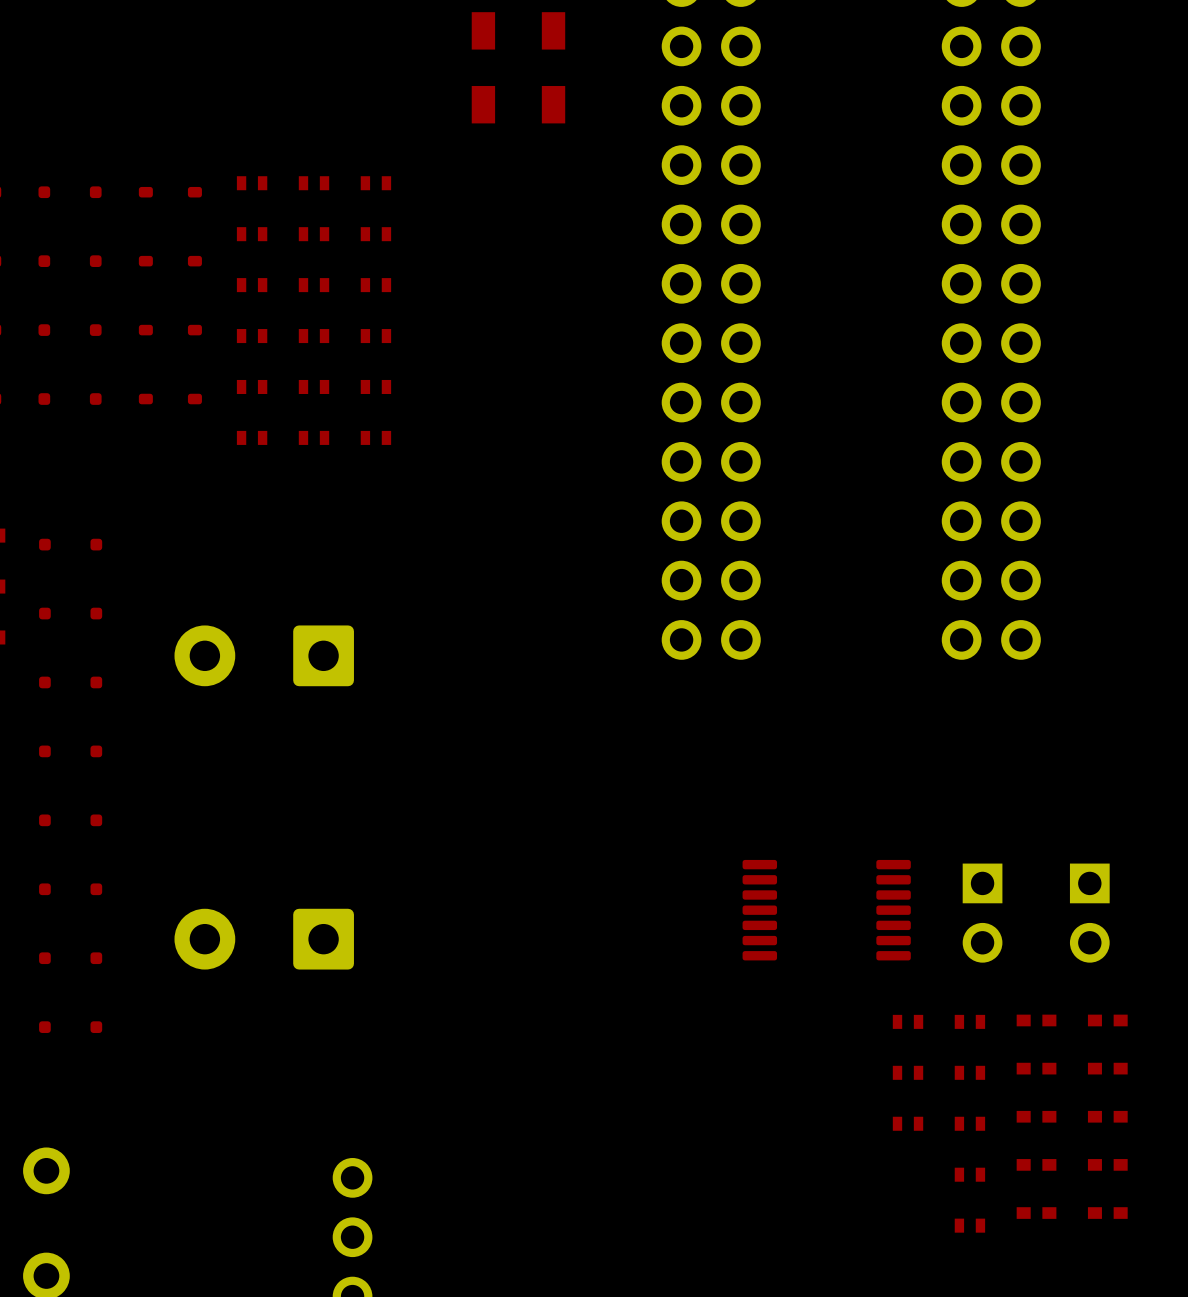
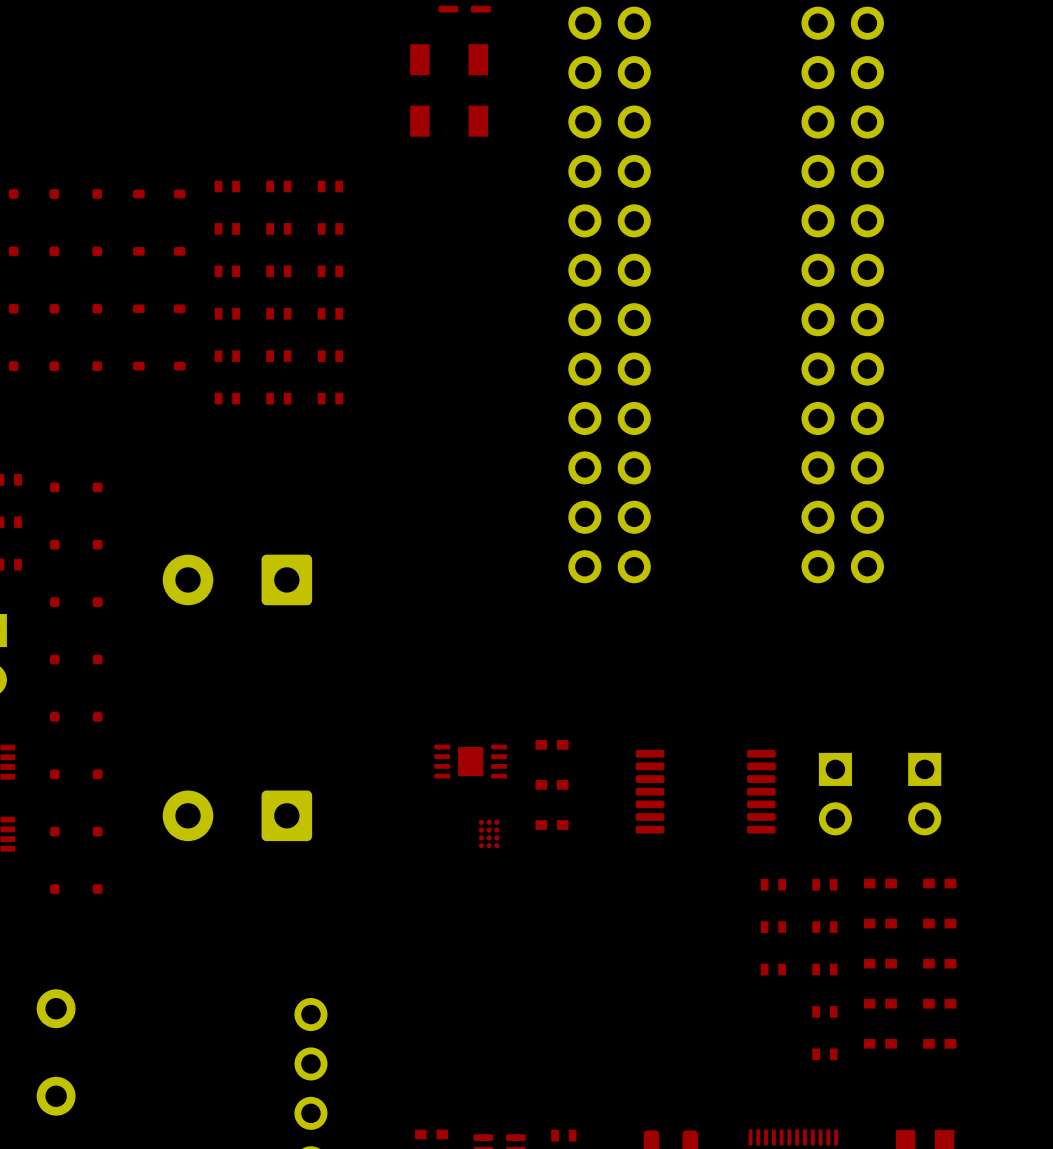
part: none -> (551, 744)
part: none -> (470, 761)
part: none -> (551, 784)
part: none -> (551, 824)
part: none -> (489, 834)

